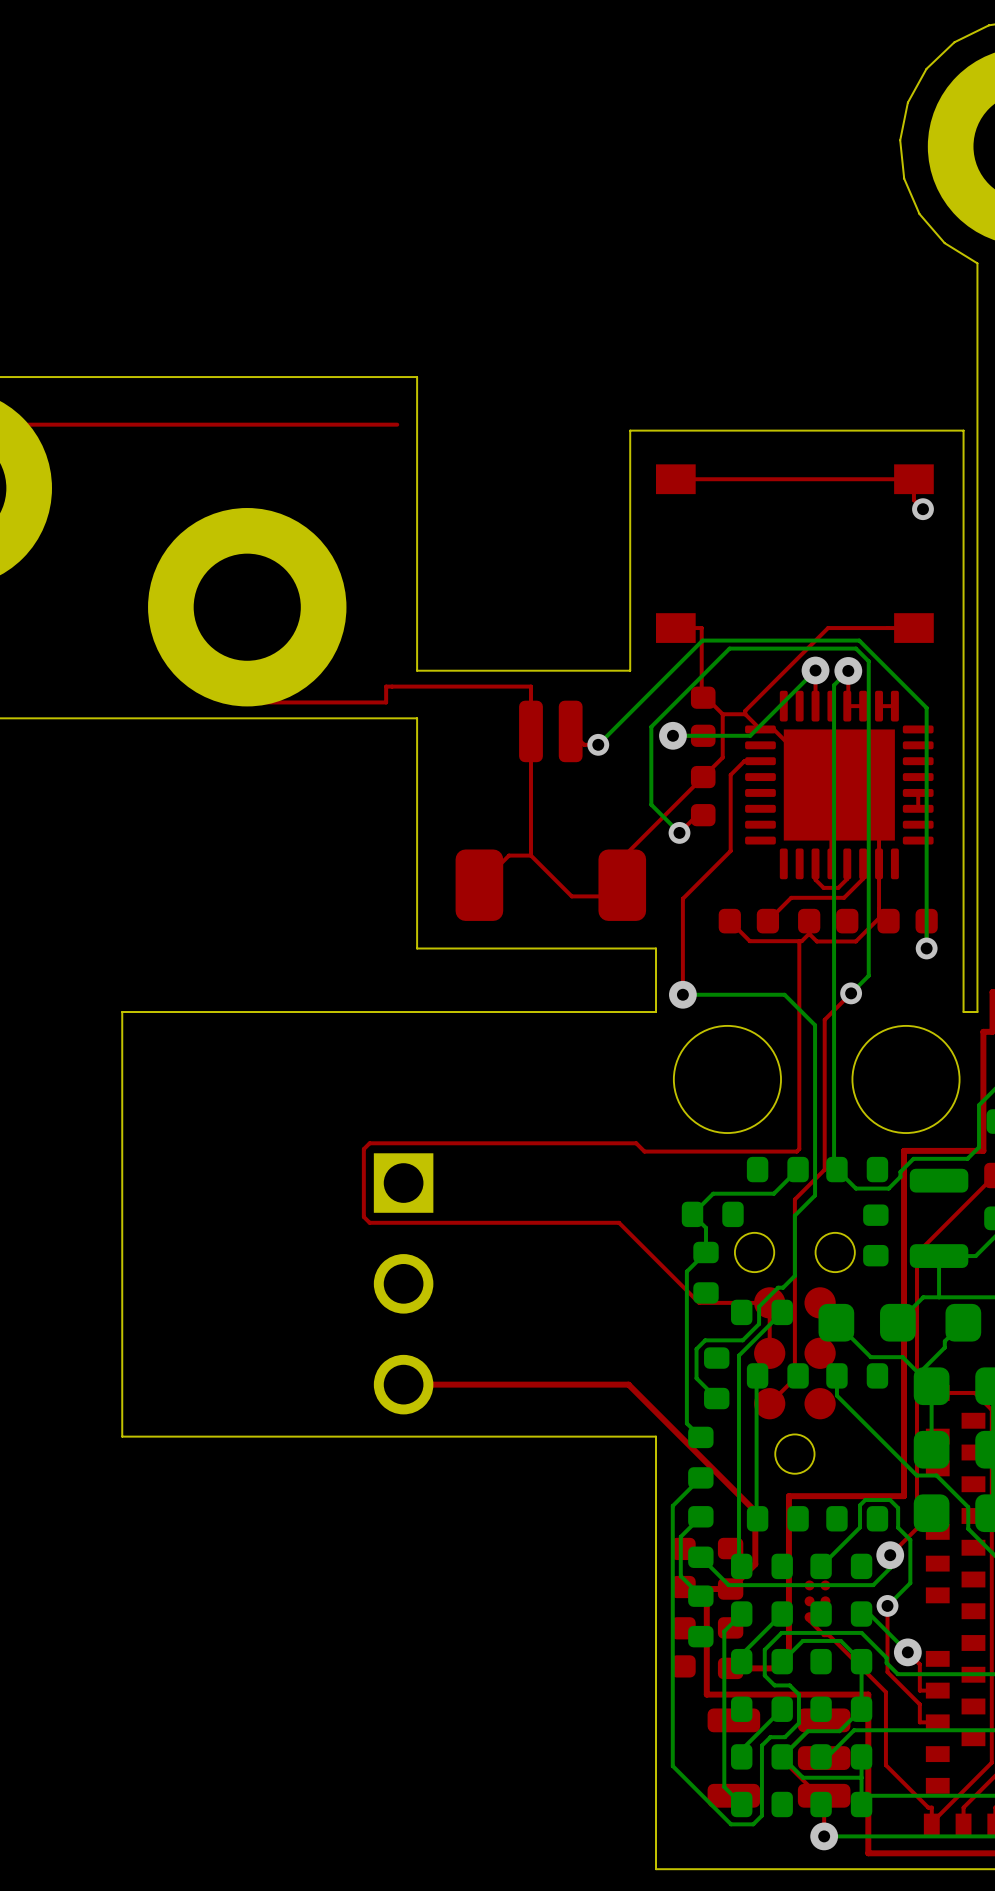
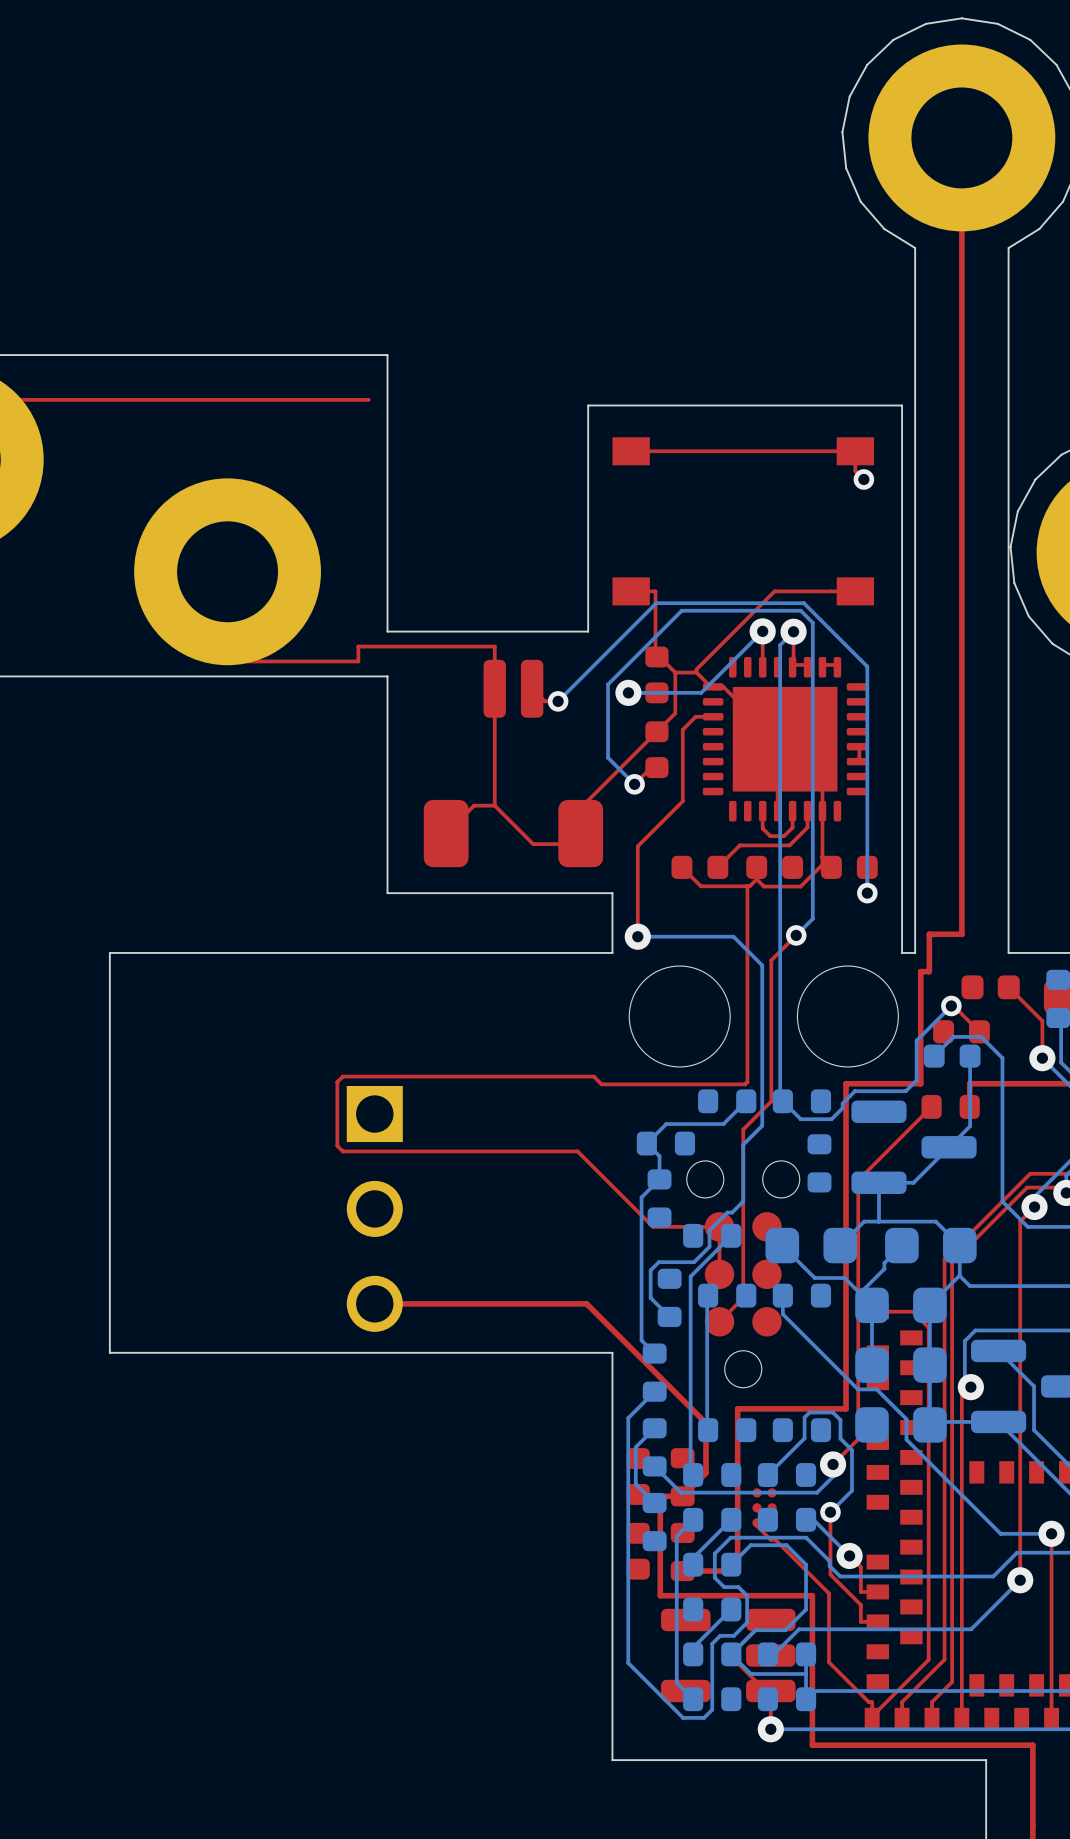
part footprint: [745, 690, 934, 880] -> [702, 656, 868, 822]
part: (841, 1661) -> none
part: (841, 1709) -> none

